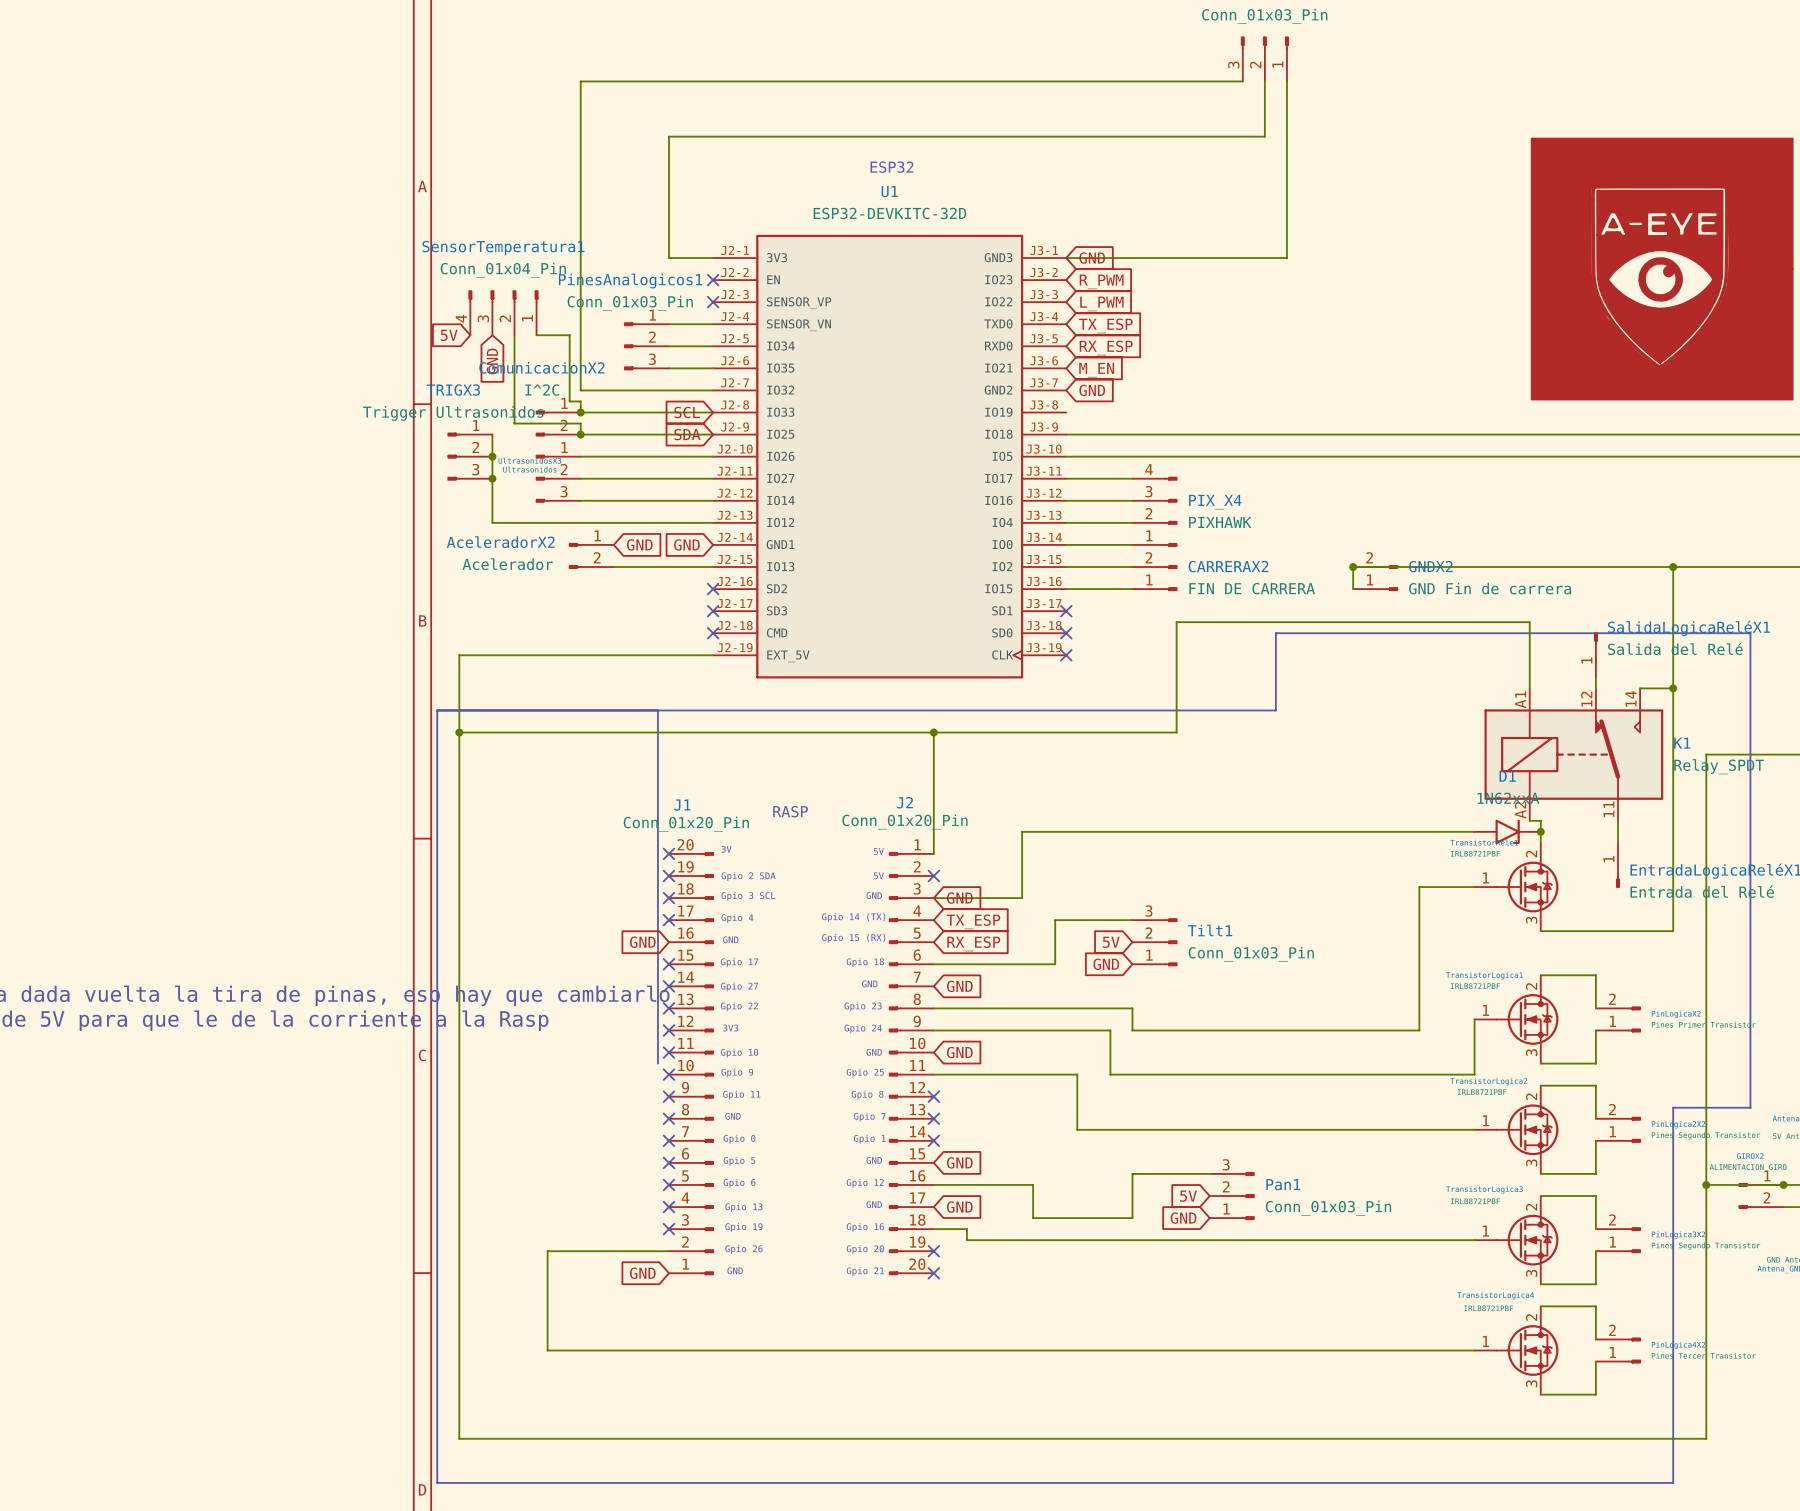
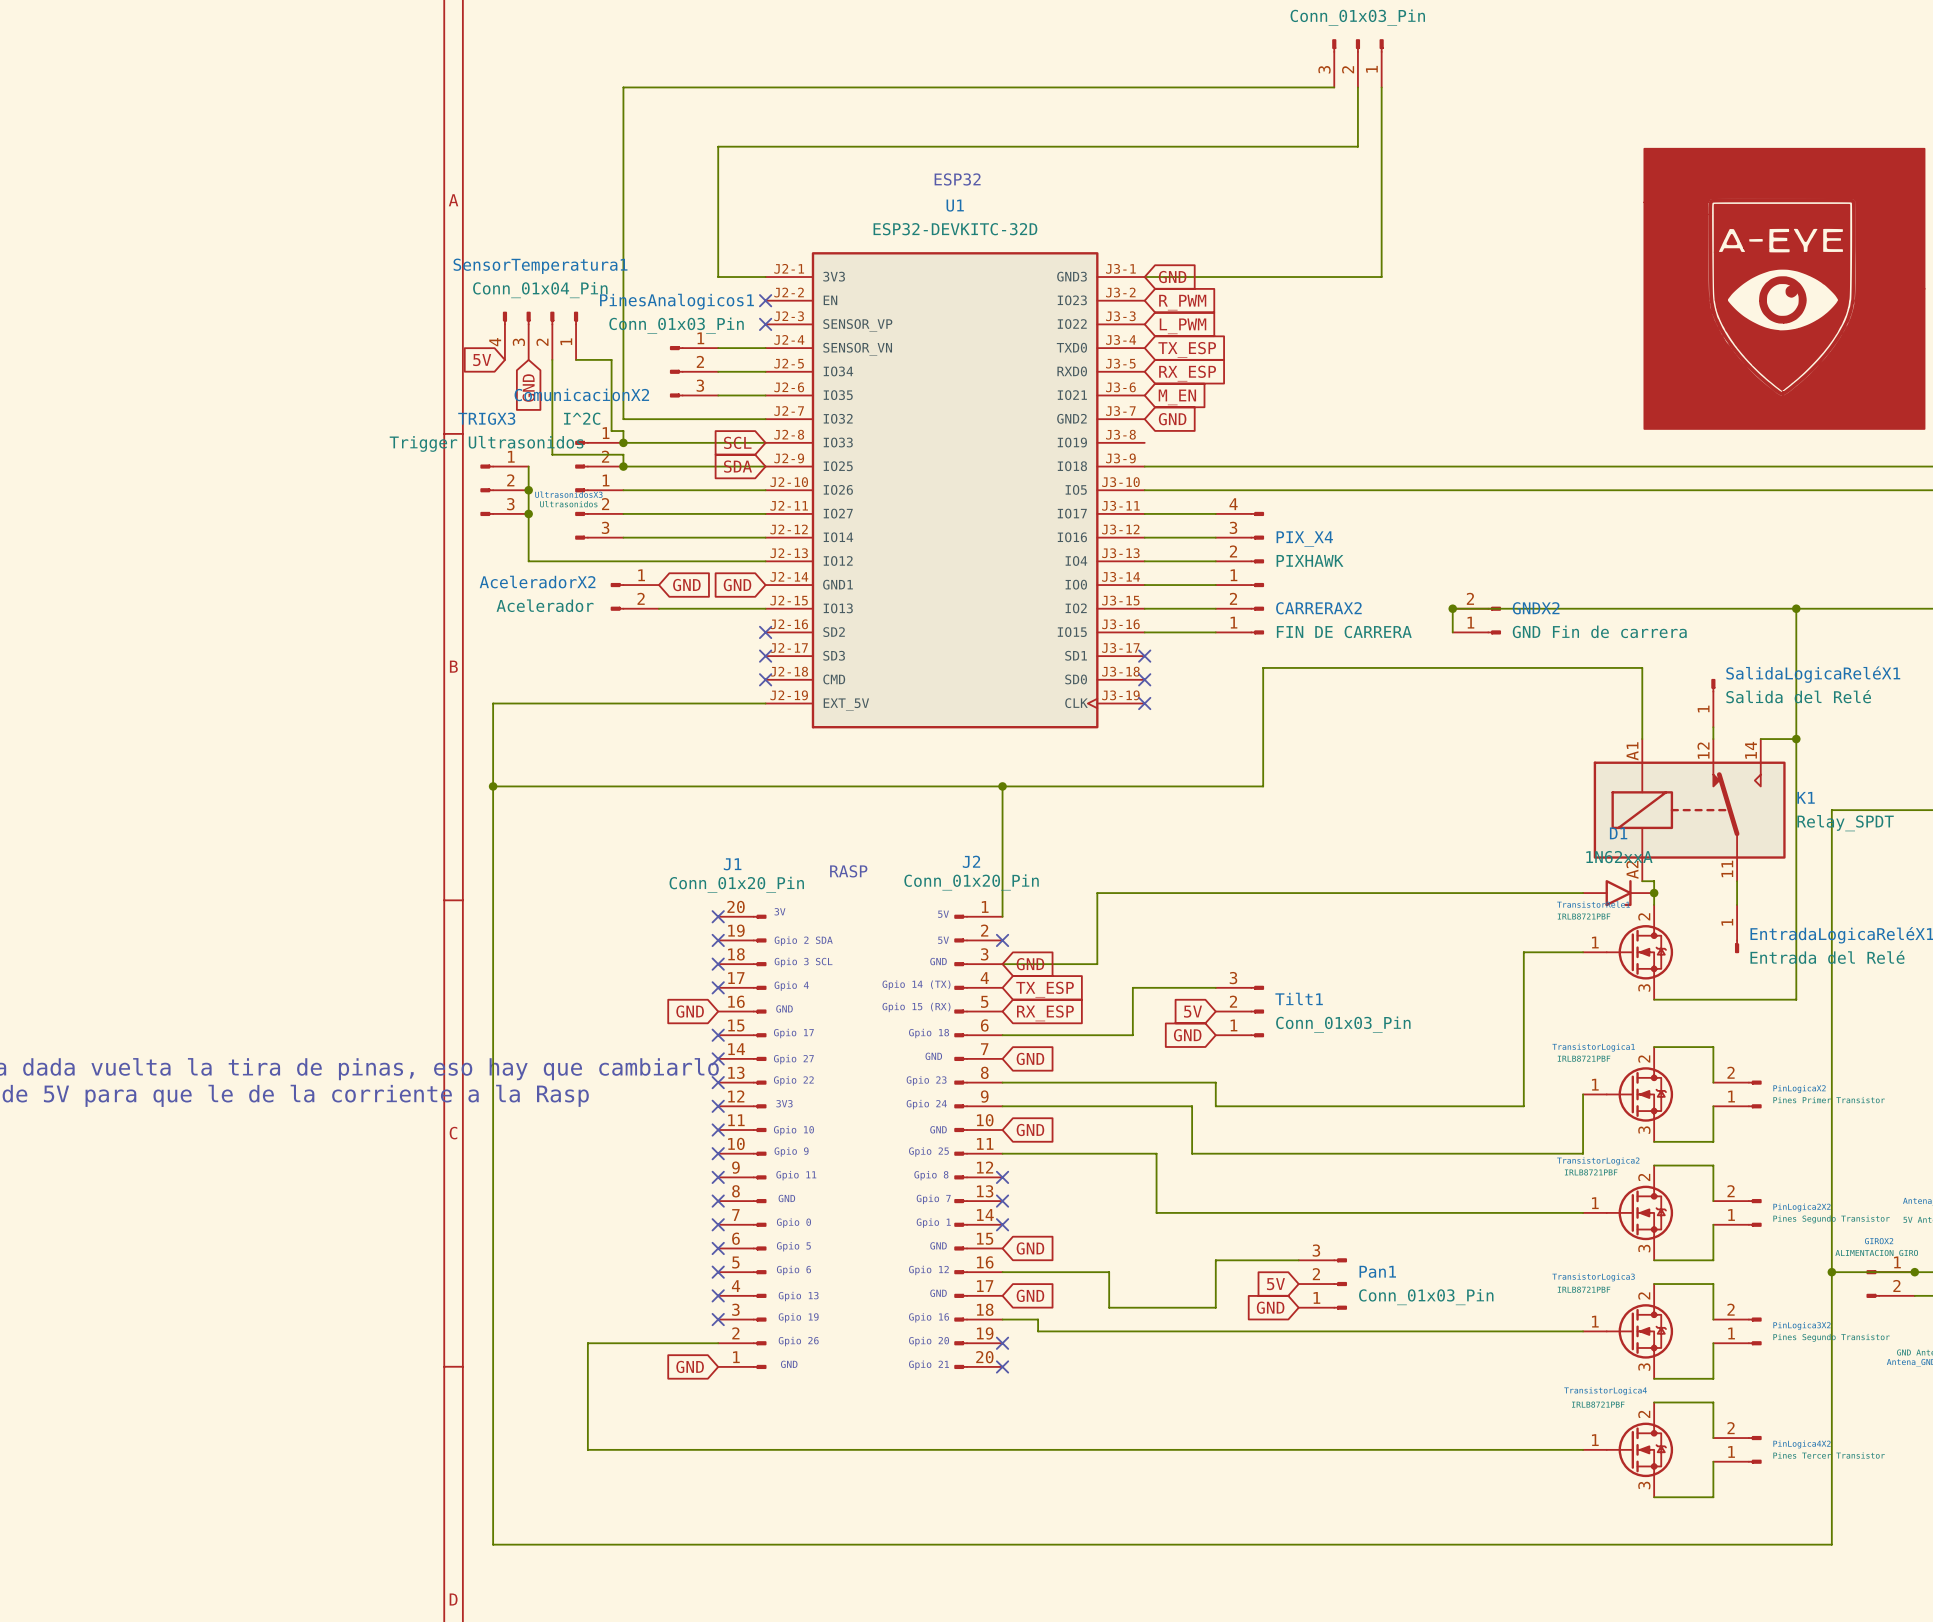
line: (1275, 633) (1275, 710) (437, 710) (437, 1482) (1673, 1482) (1673, 1107) (1750, 1107) (1750, 633) (1275, 633) -> none
line: (657, 710) (657, 1063) -> none

